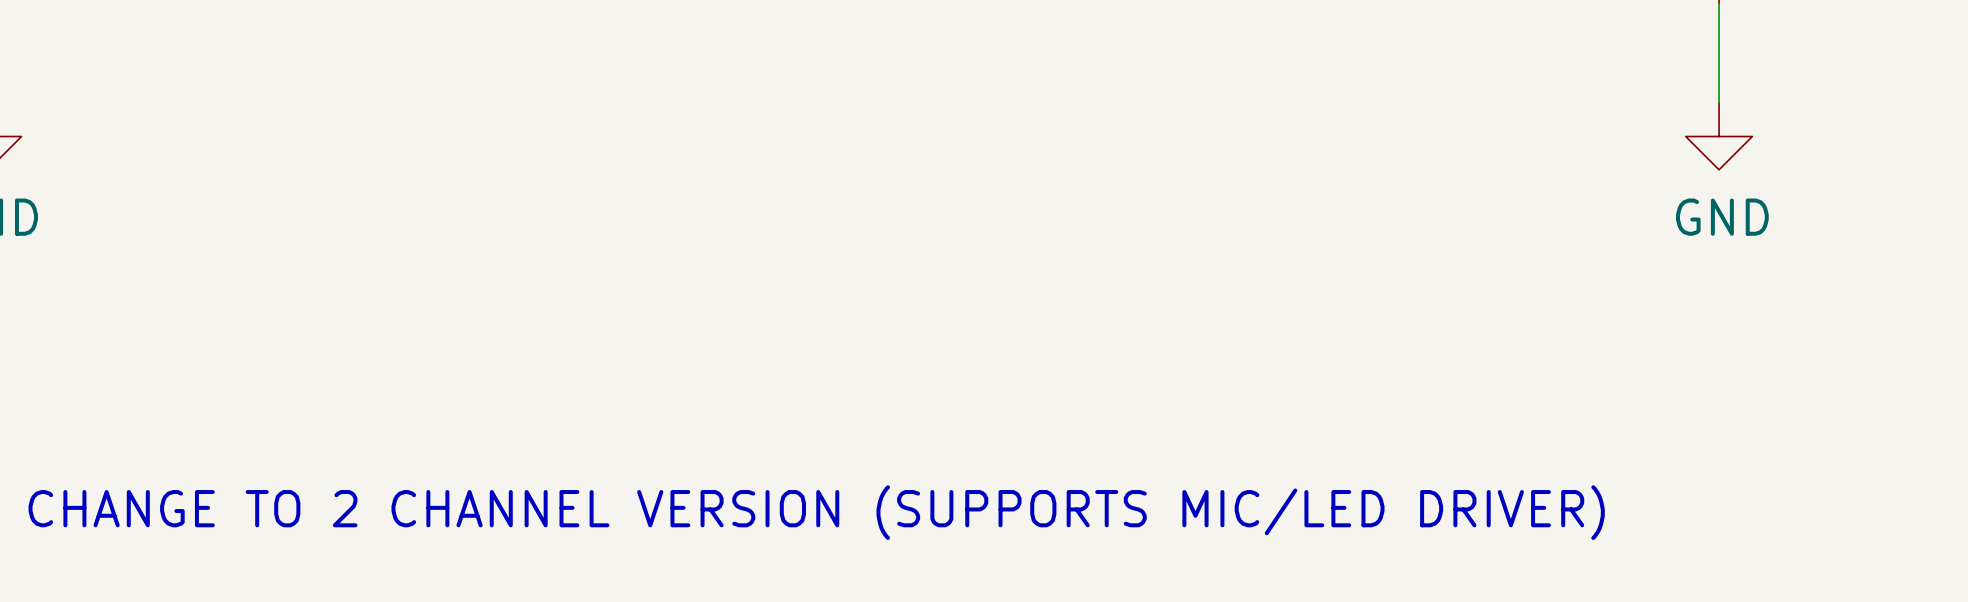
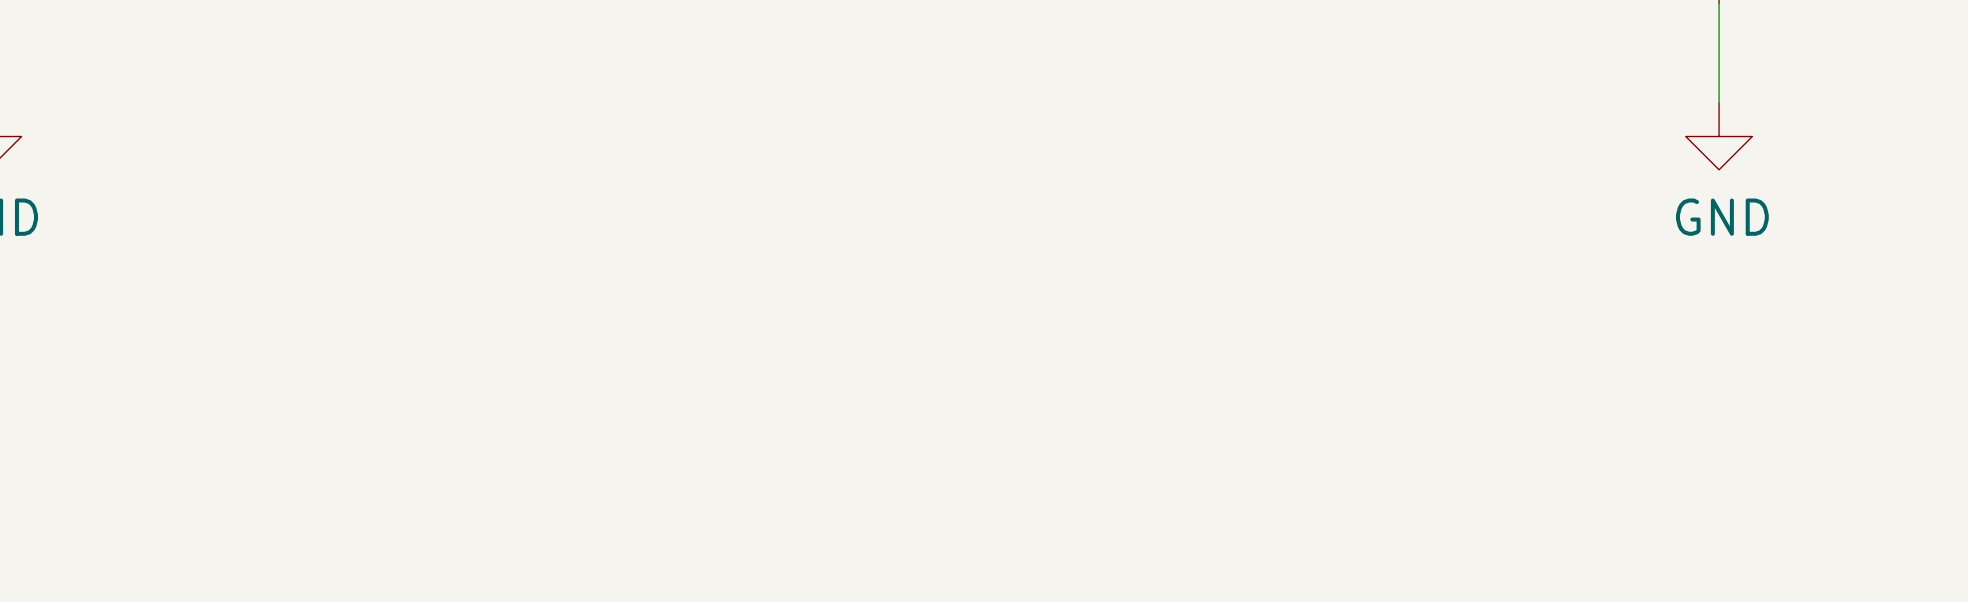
text: CHANGE TO 2 CHANNEL VERSION (SUPPORTS MIC/LED DRIVER) (816, 512) -> none

